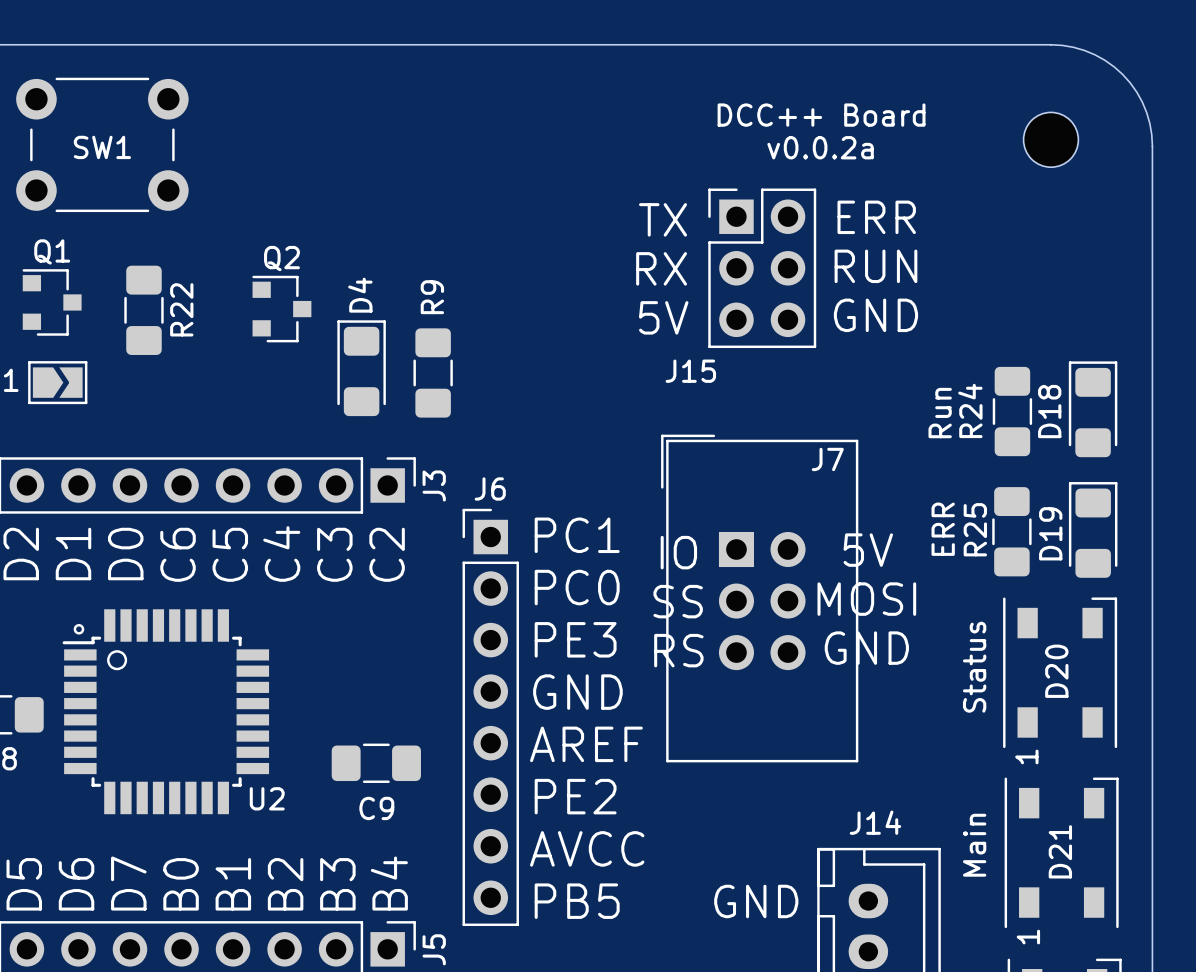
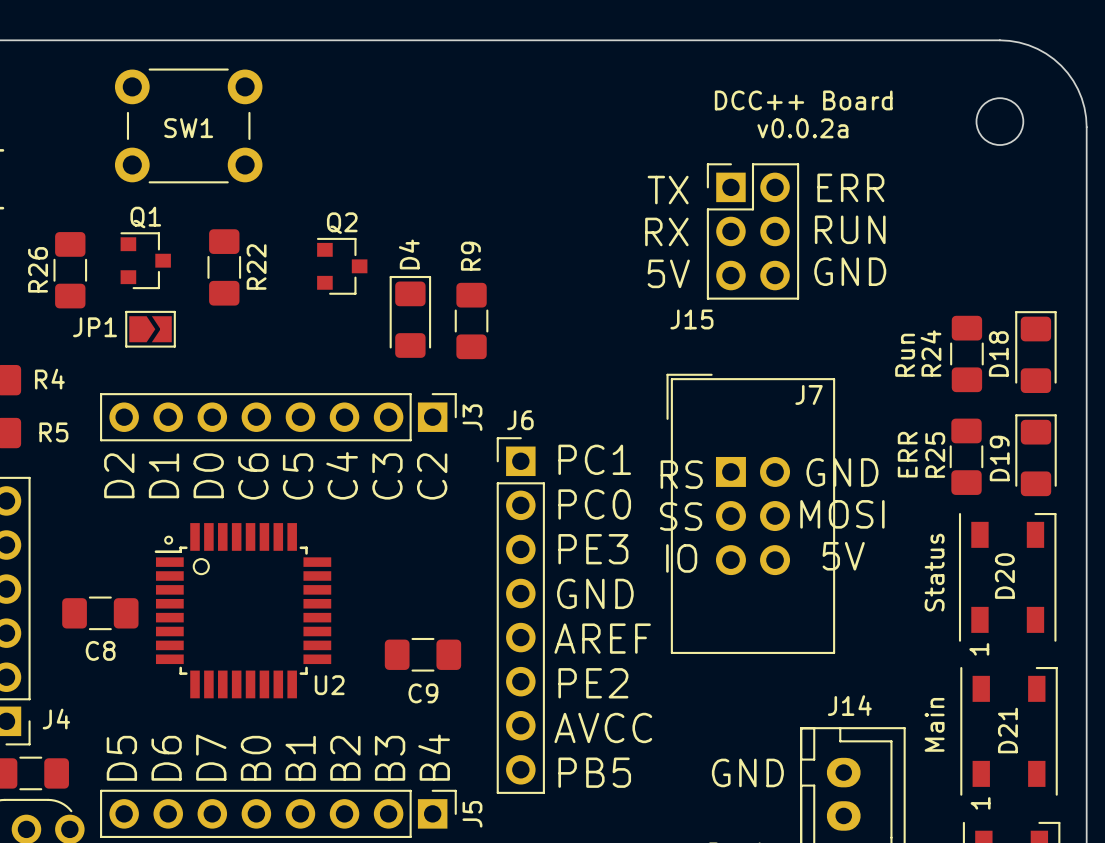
text: 5V (868, 550) -> GND (842, 472)
text: IO (678, 552) -> RS (681, 474)
text: GND (866, 648) -> 5V (843, 556)
text: RS (678, 650) -> IO (681, 558)

